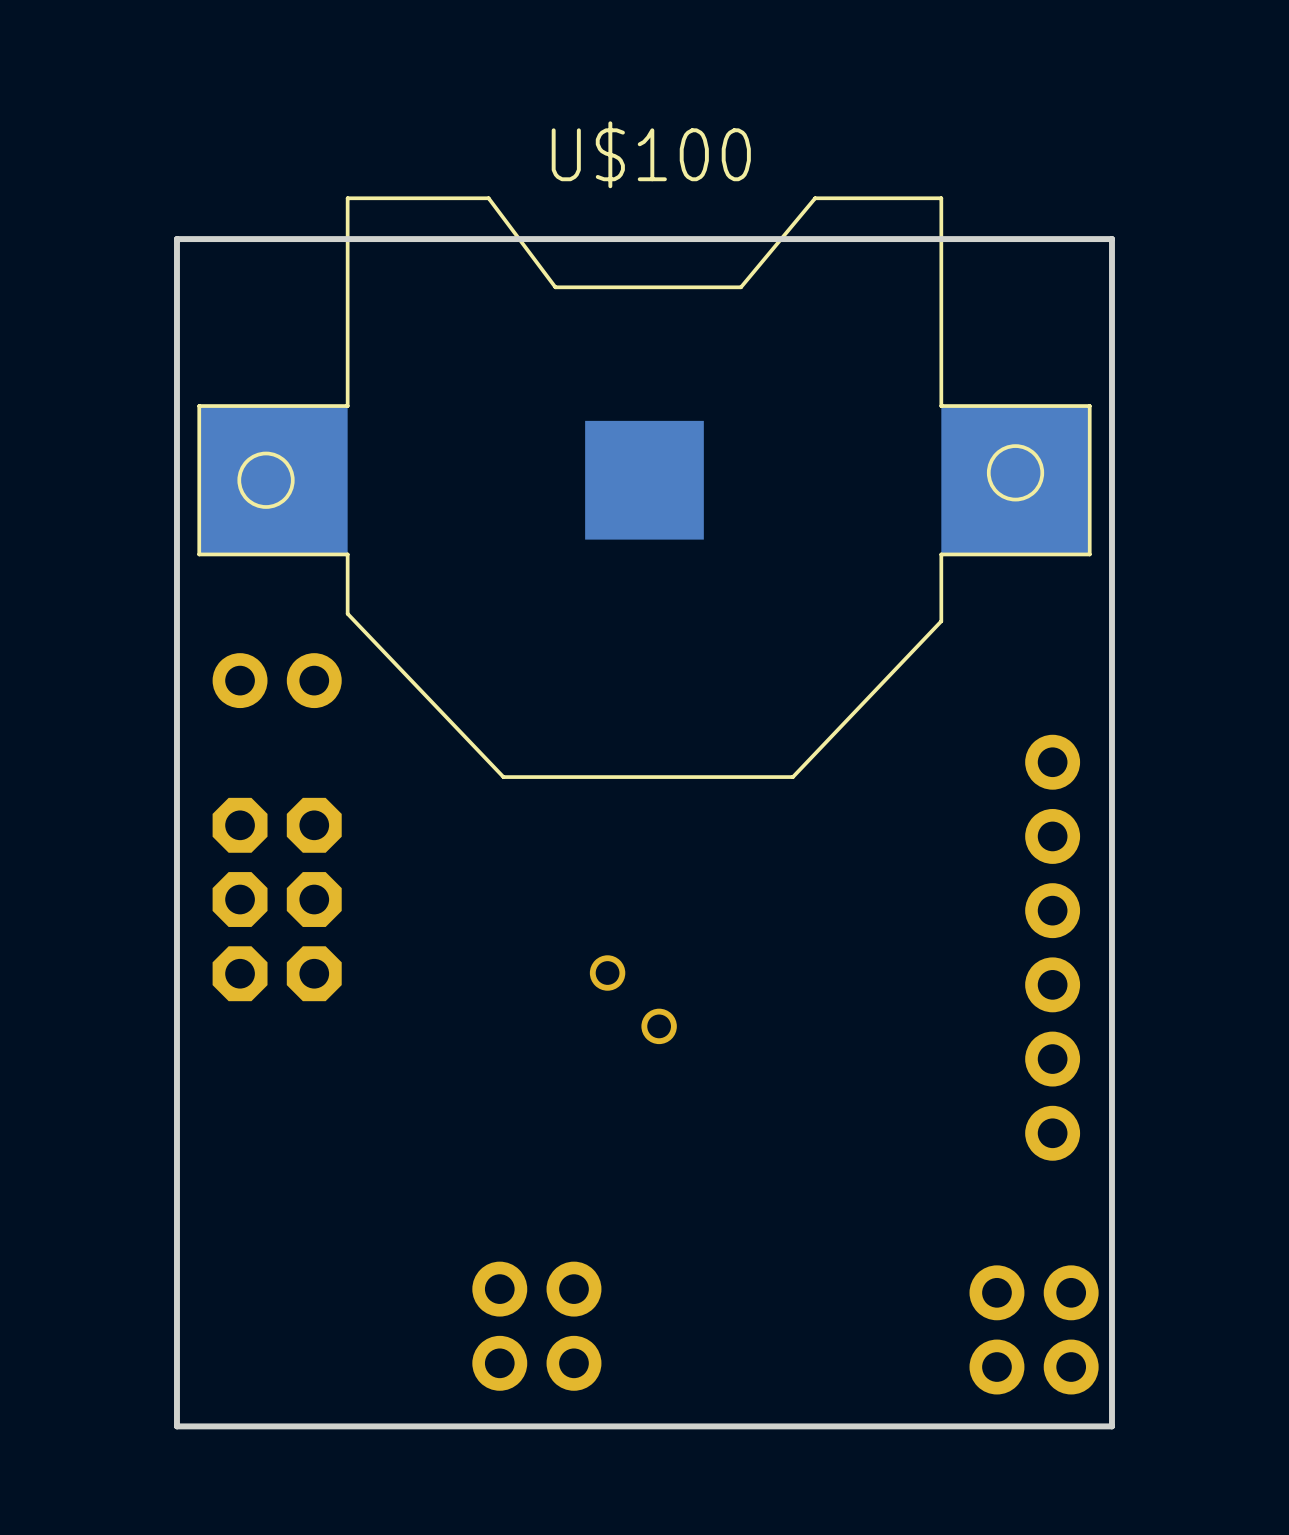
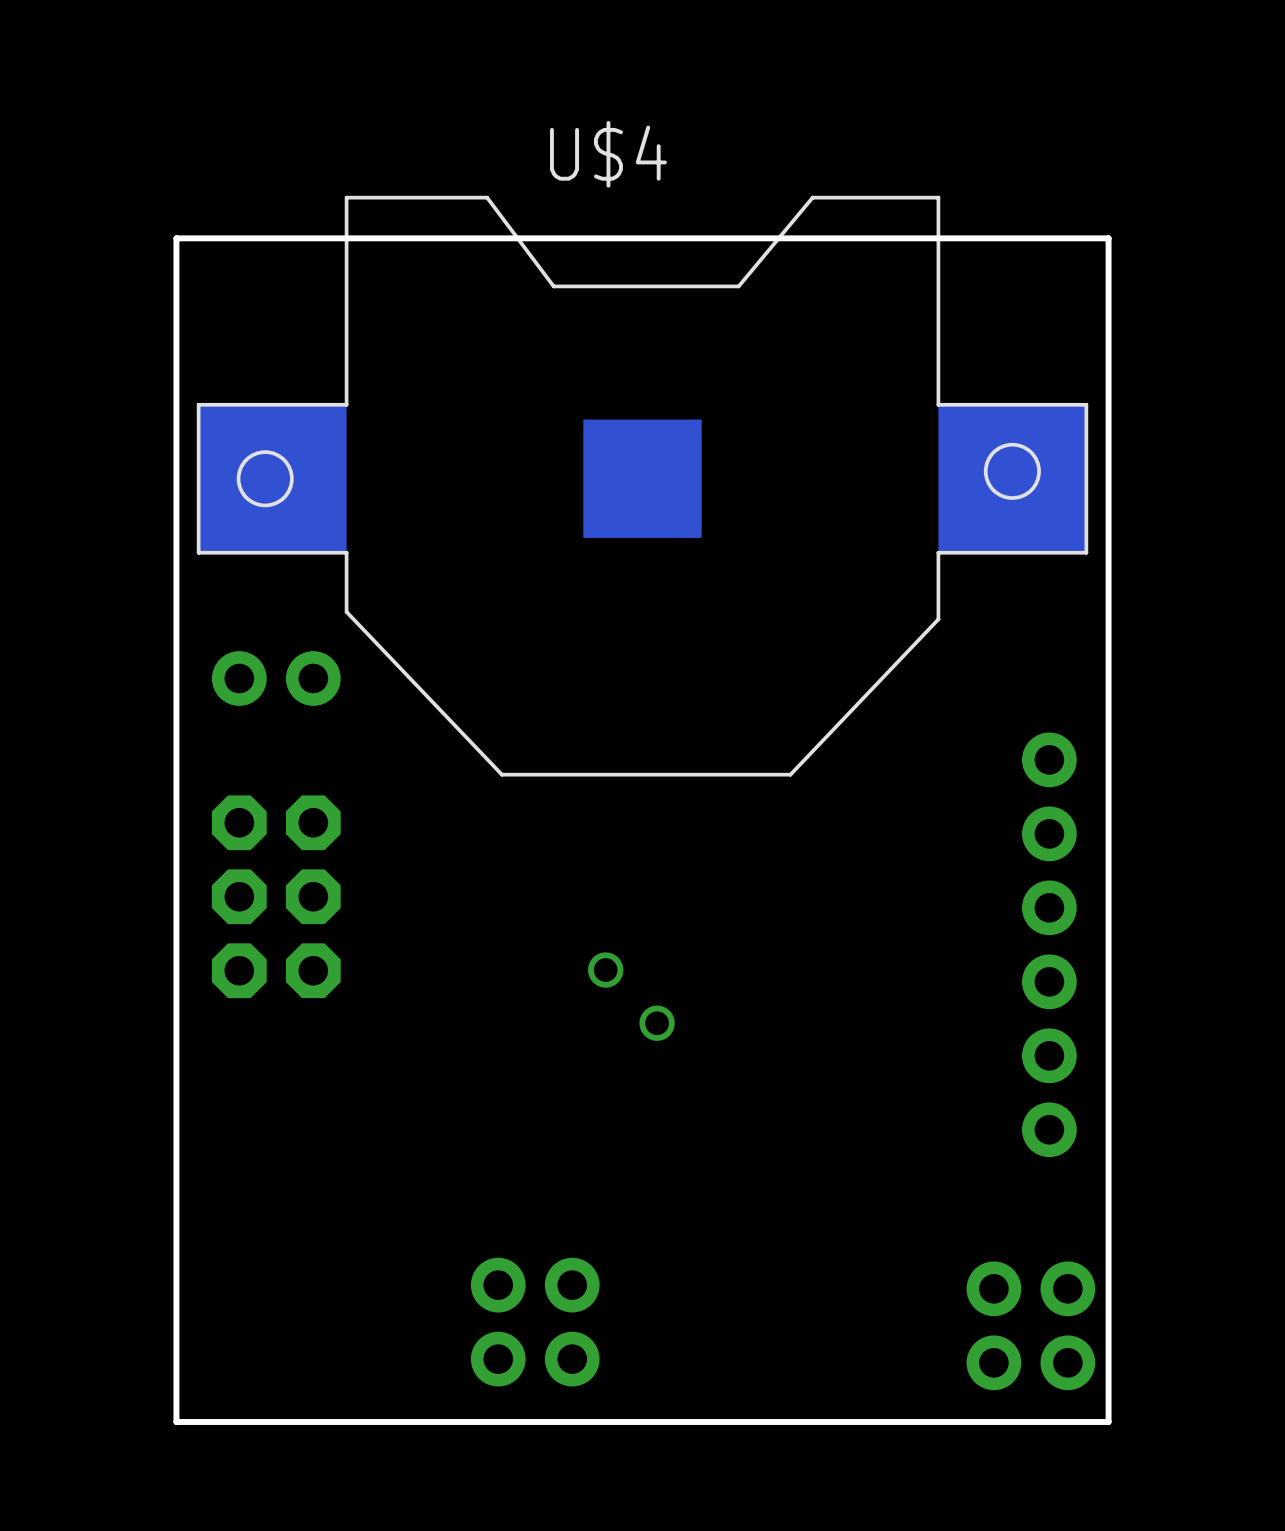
U$100 name: U$100 (651, 154) -> U$4 (608, 154)

